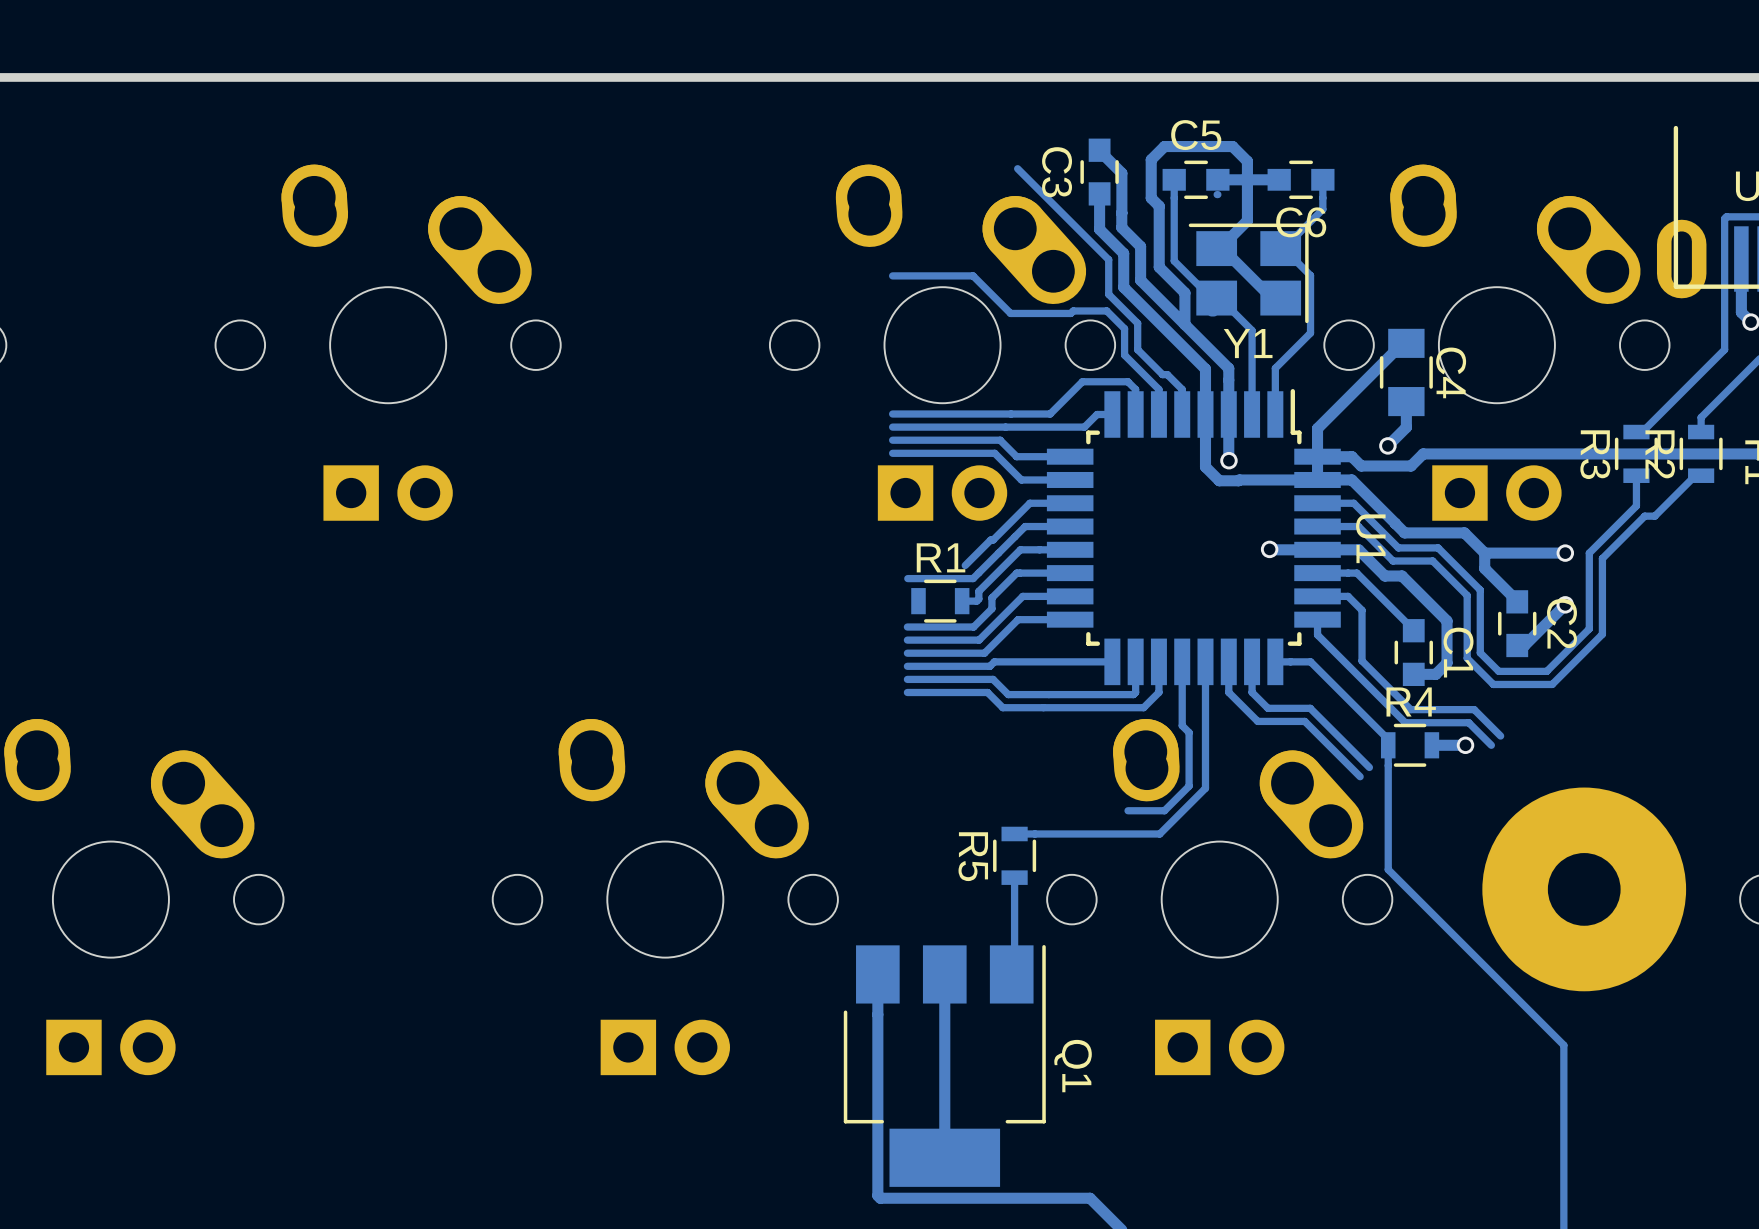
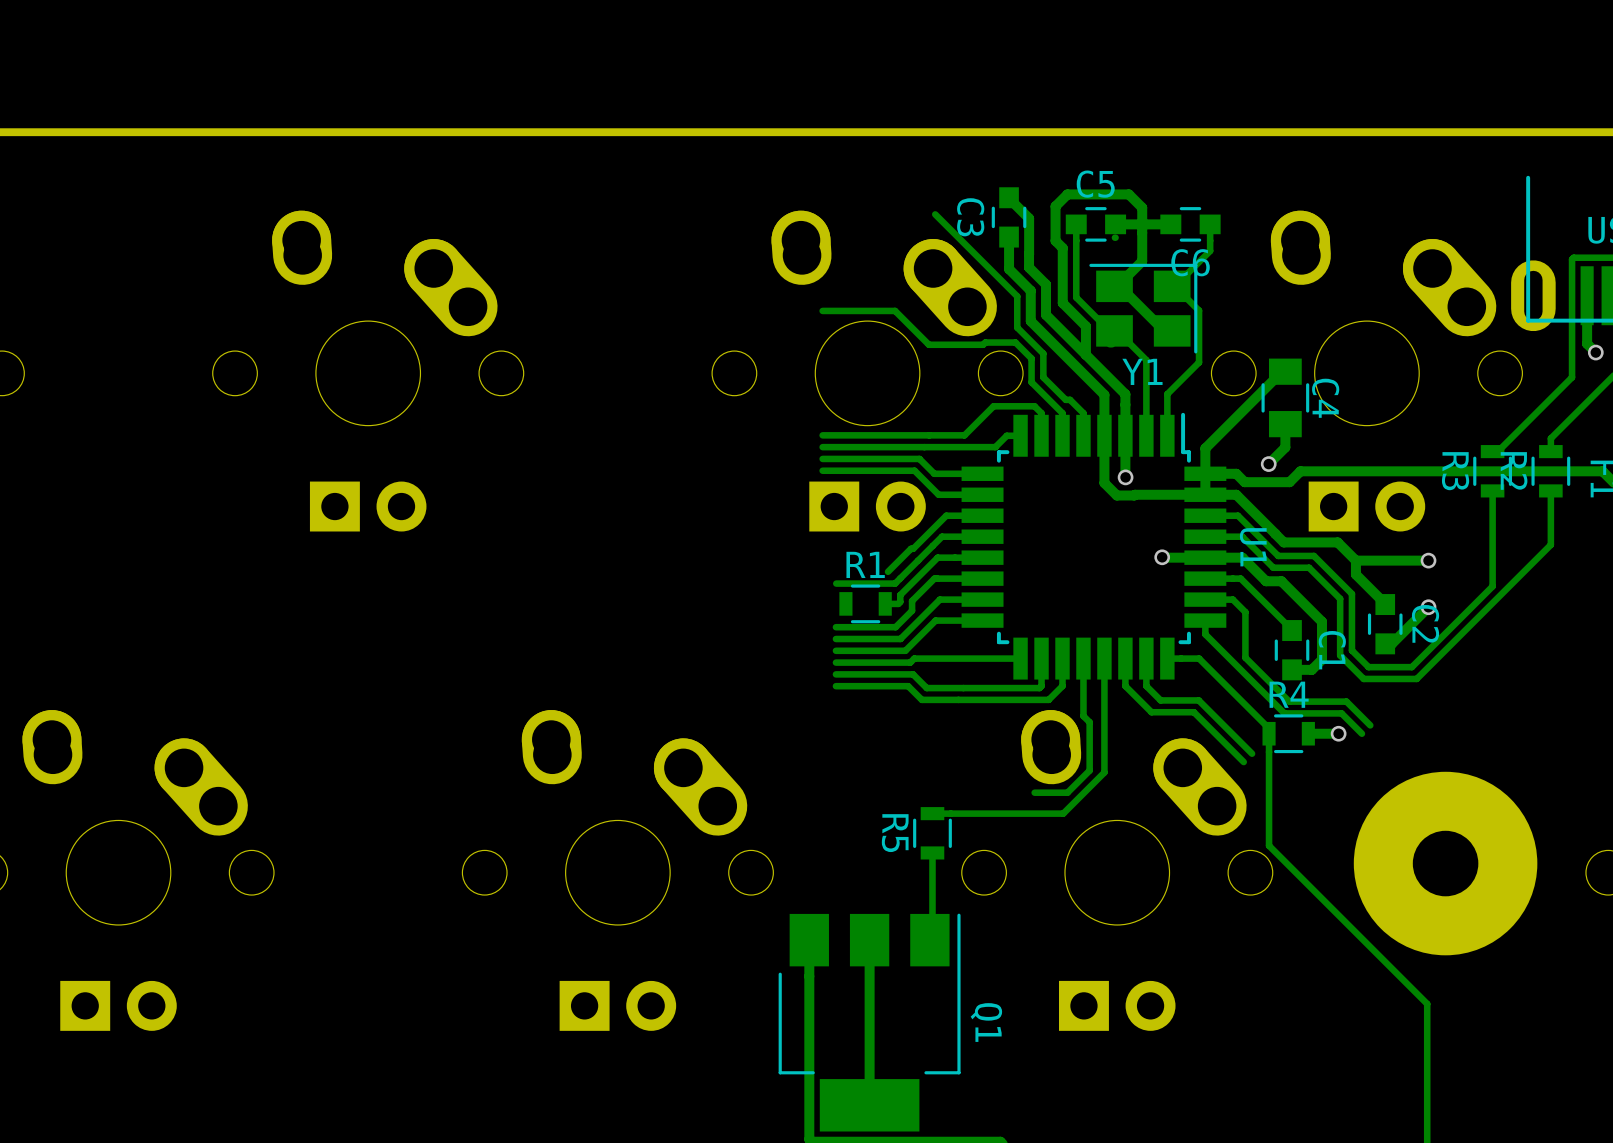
track: (1701, 475) (1695, 475) (1654, 516) (1644, 516) (1602, 558) (1602, 634) -> (1550, 490) (1550, 544) (1461, 633)
track: (1636, 505) (1589, 553) (1589, 628) -> (1492, 518) (1492, 586) (1450, 628)

